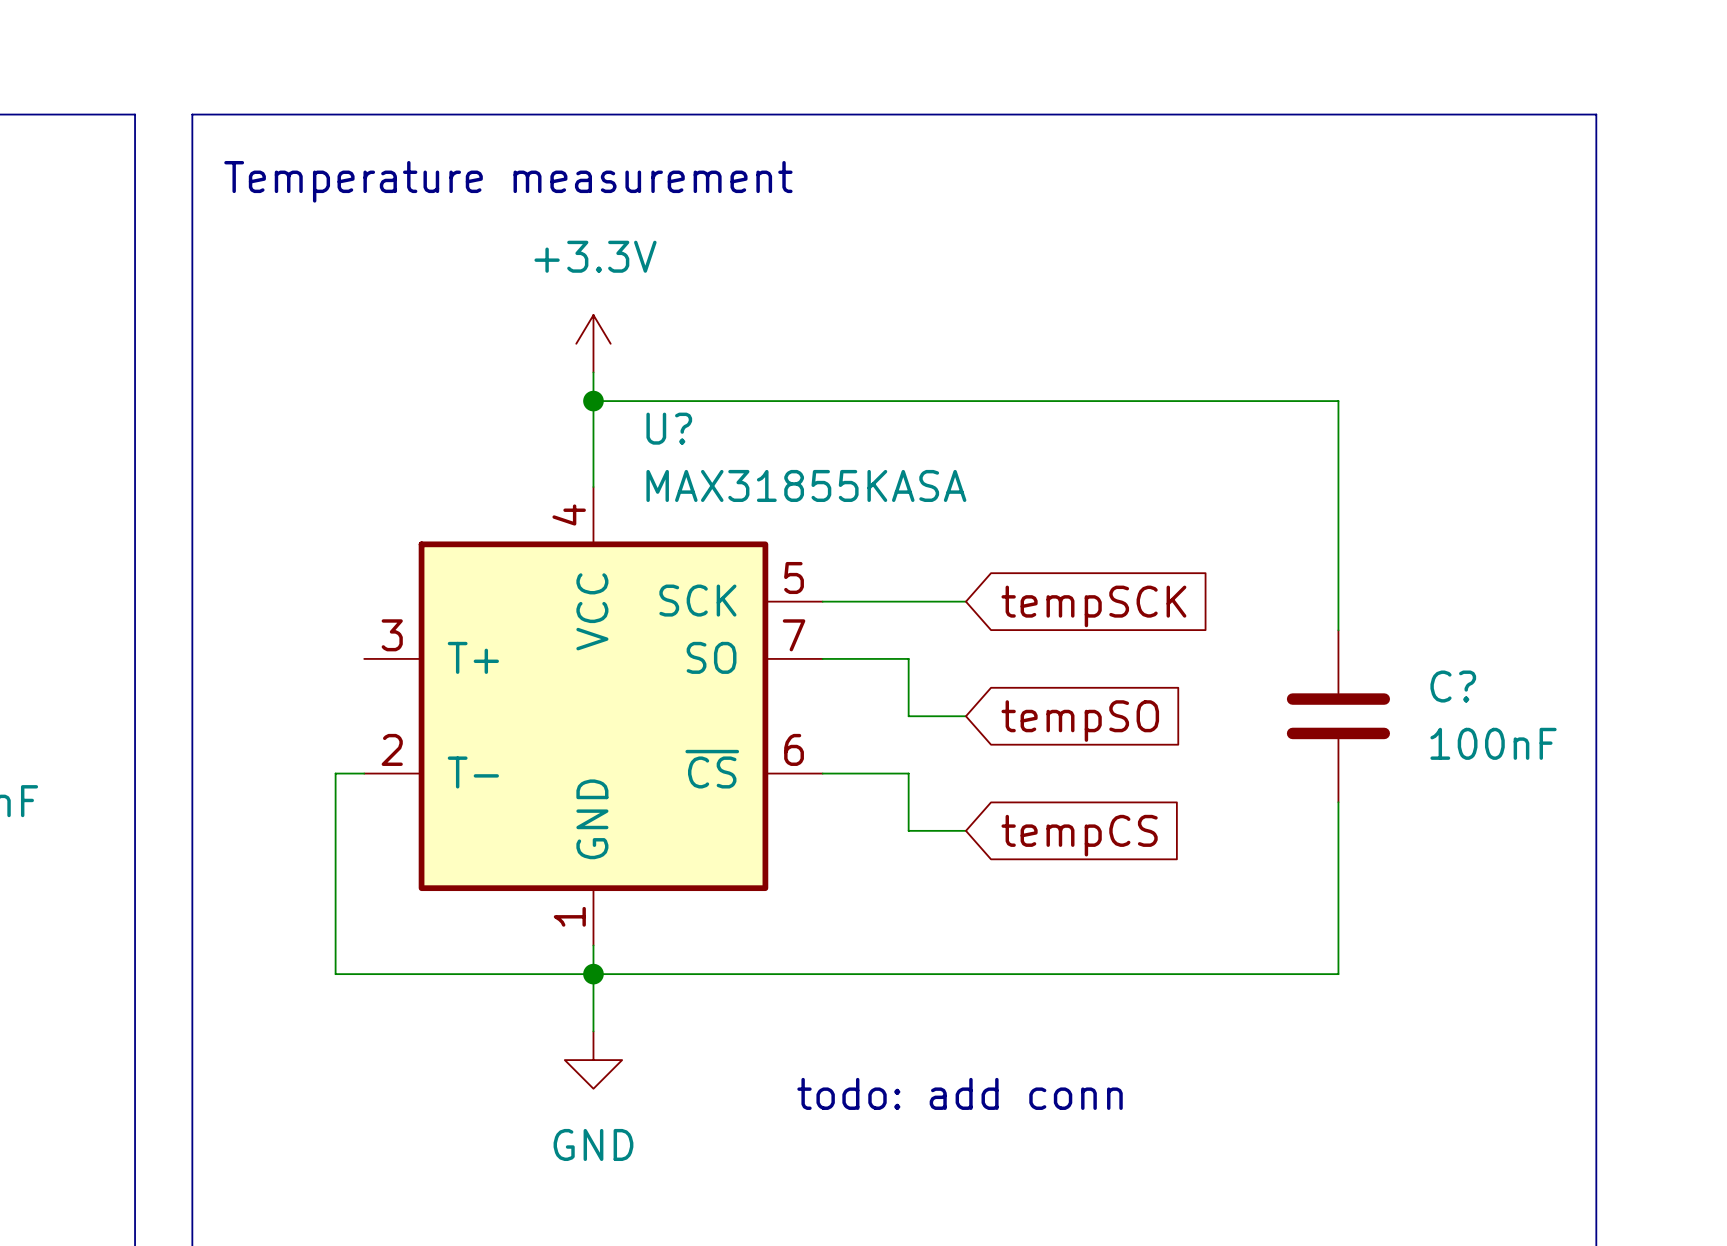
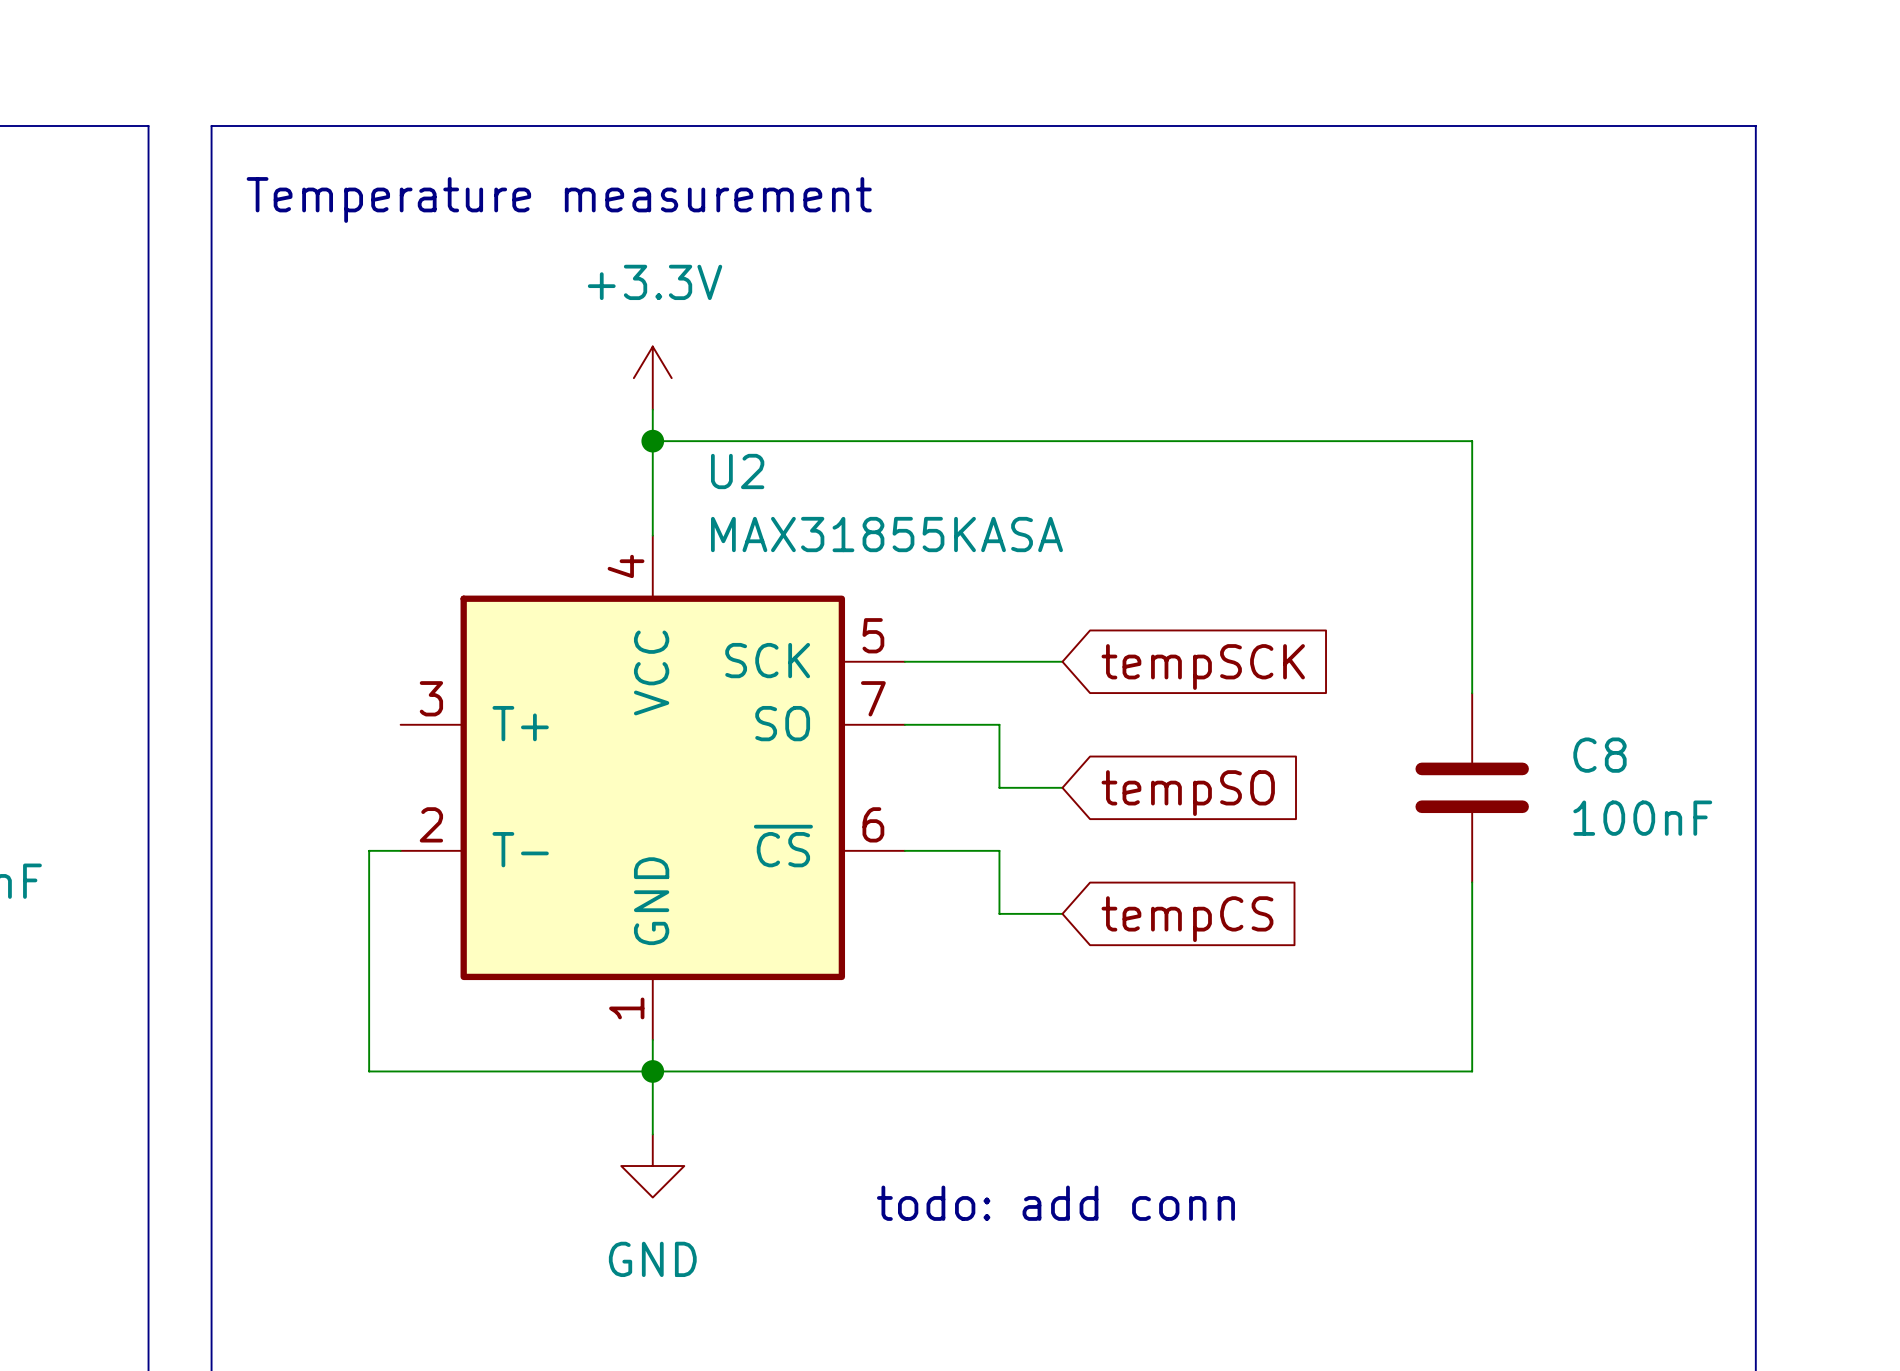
U? name: U? (669, 428) -> U2 (737, 471)
C? name: C? (1453, 686) -> C8 (1599, 755)

